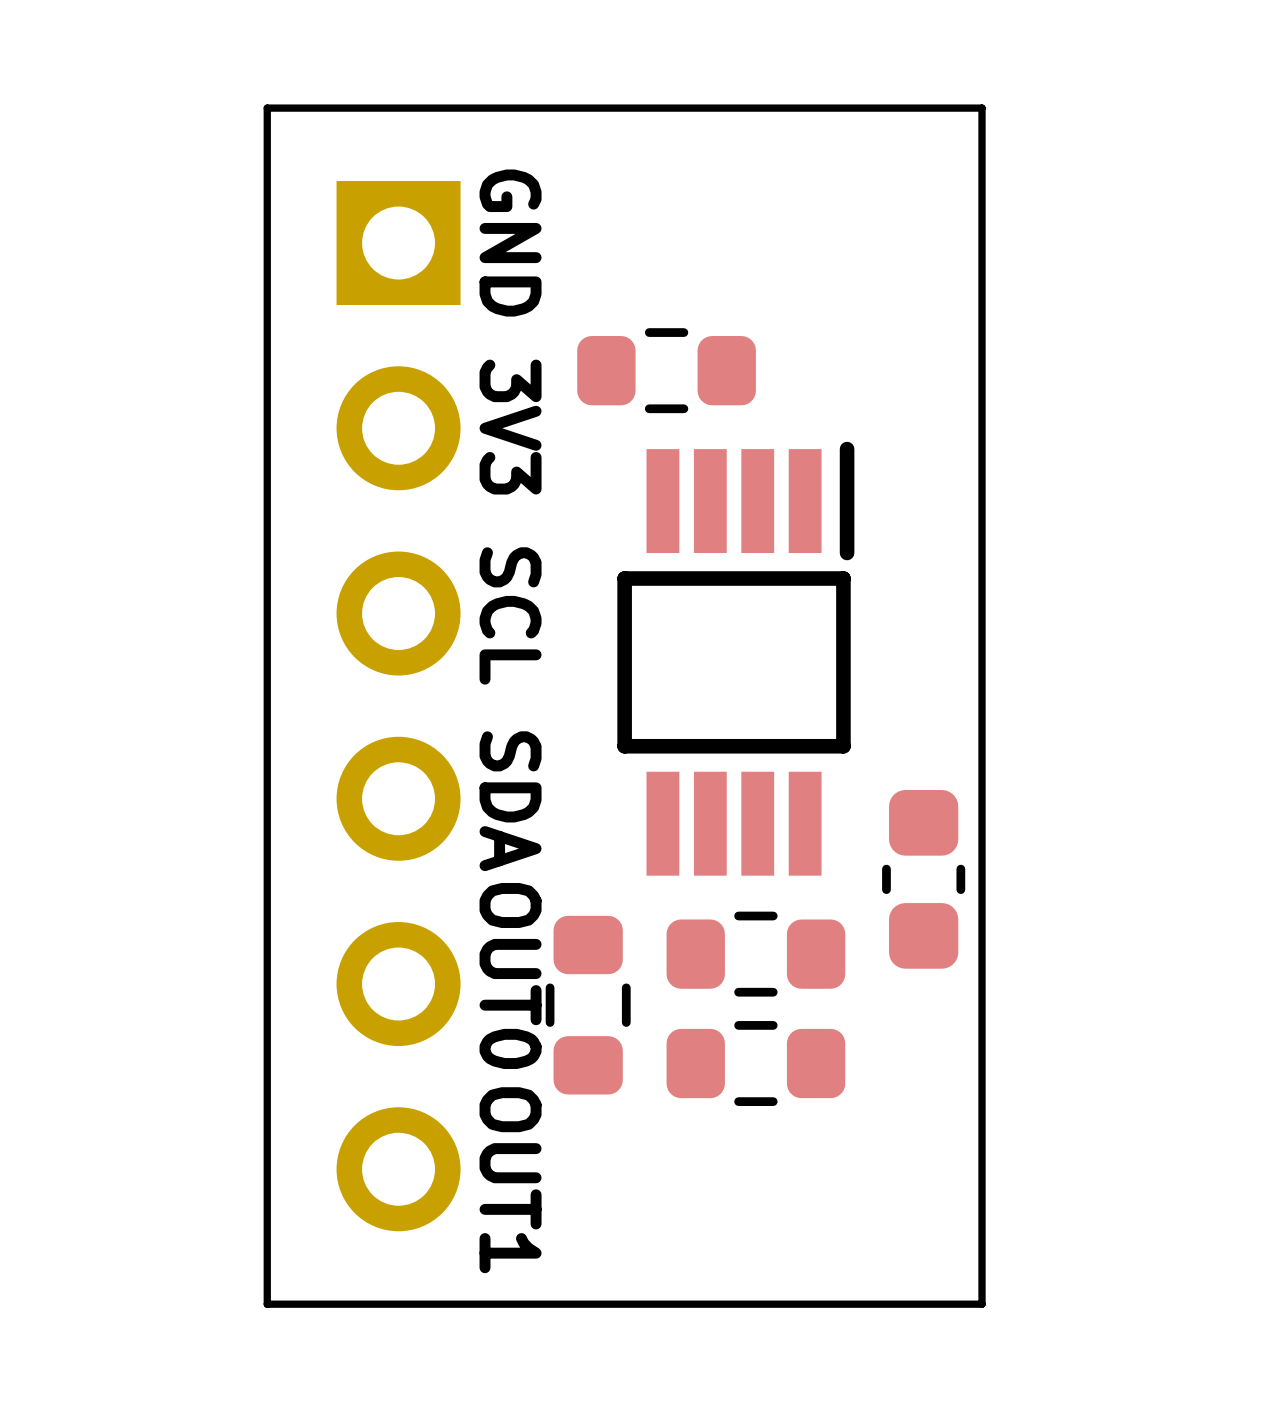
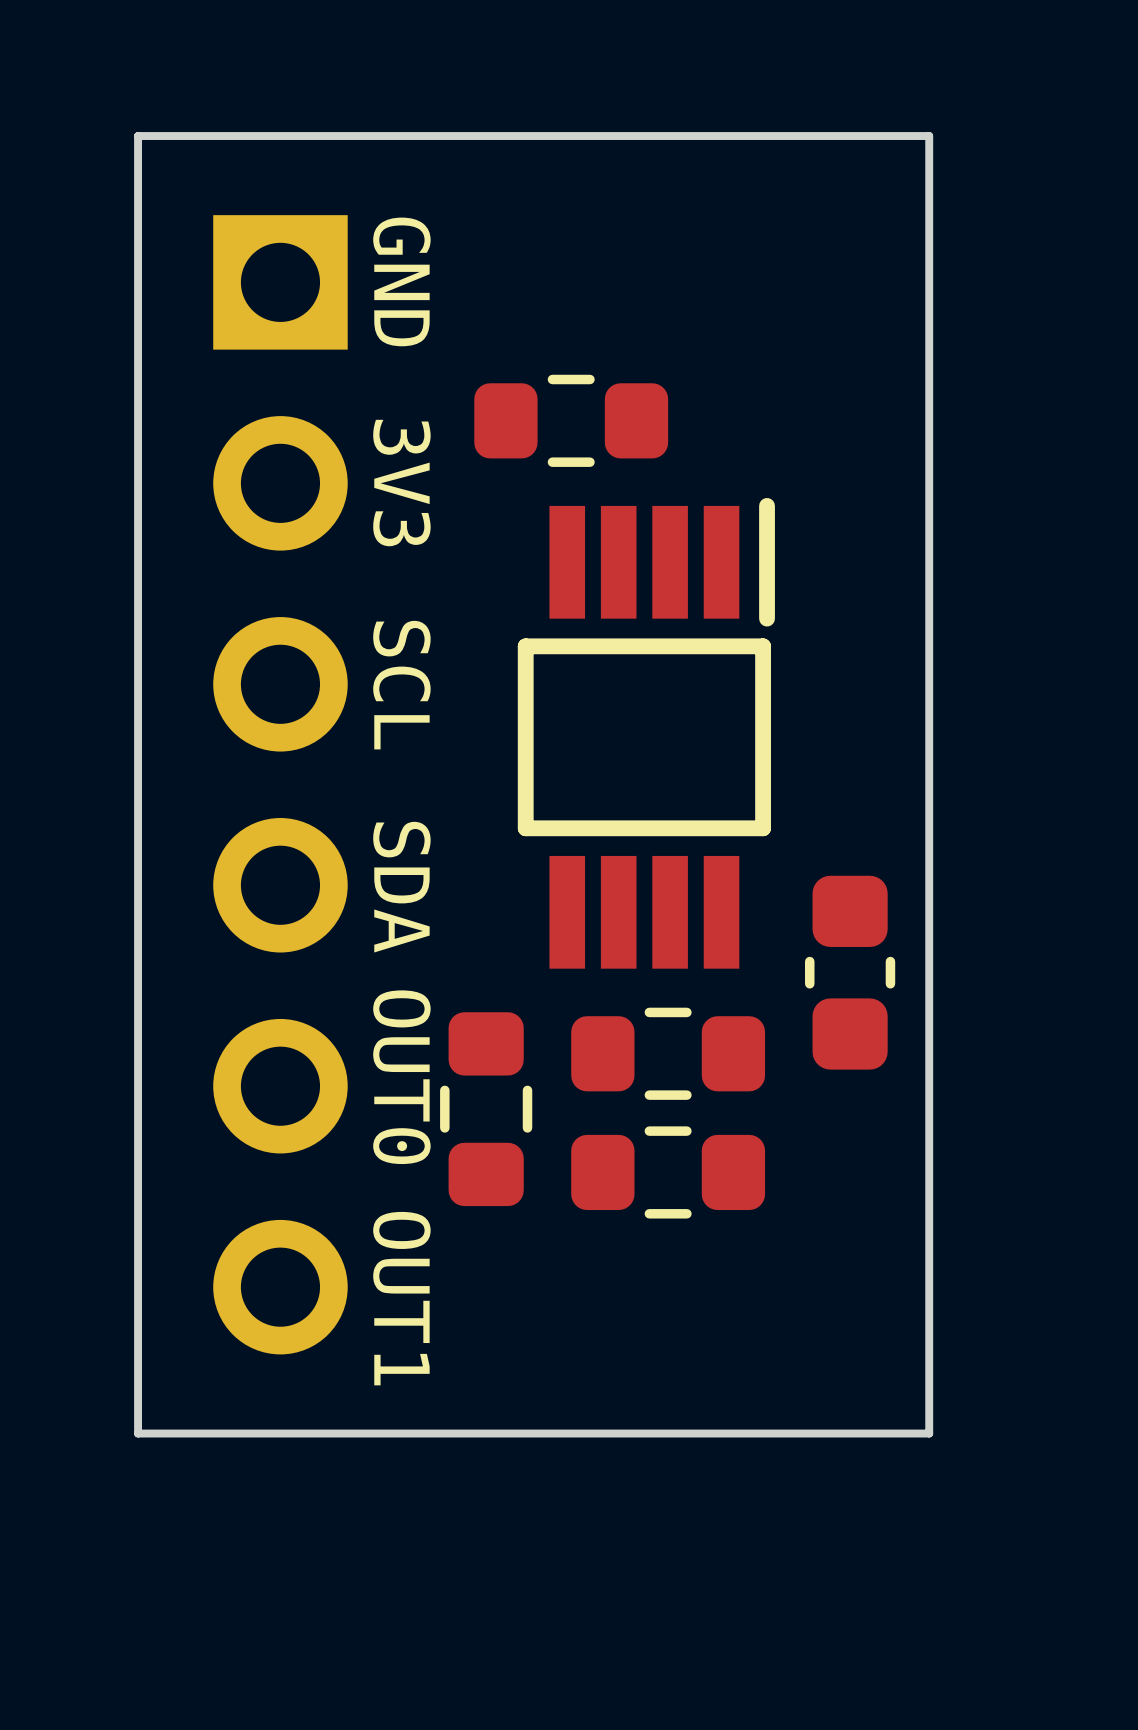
board edge: (982, 108) (982, 1304) -> (913, 136) (929, 136) (929, 1433) (913, 1433)

